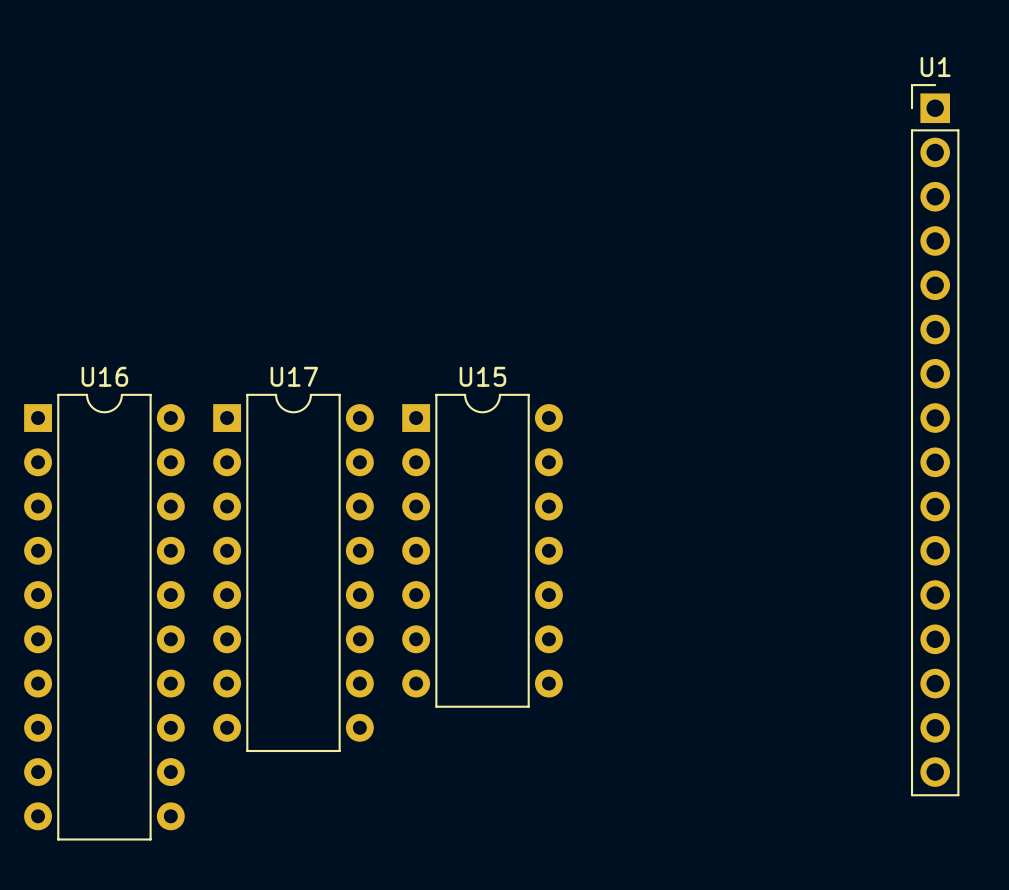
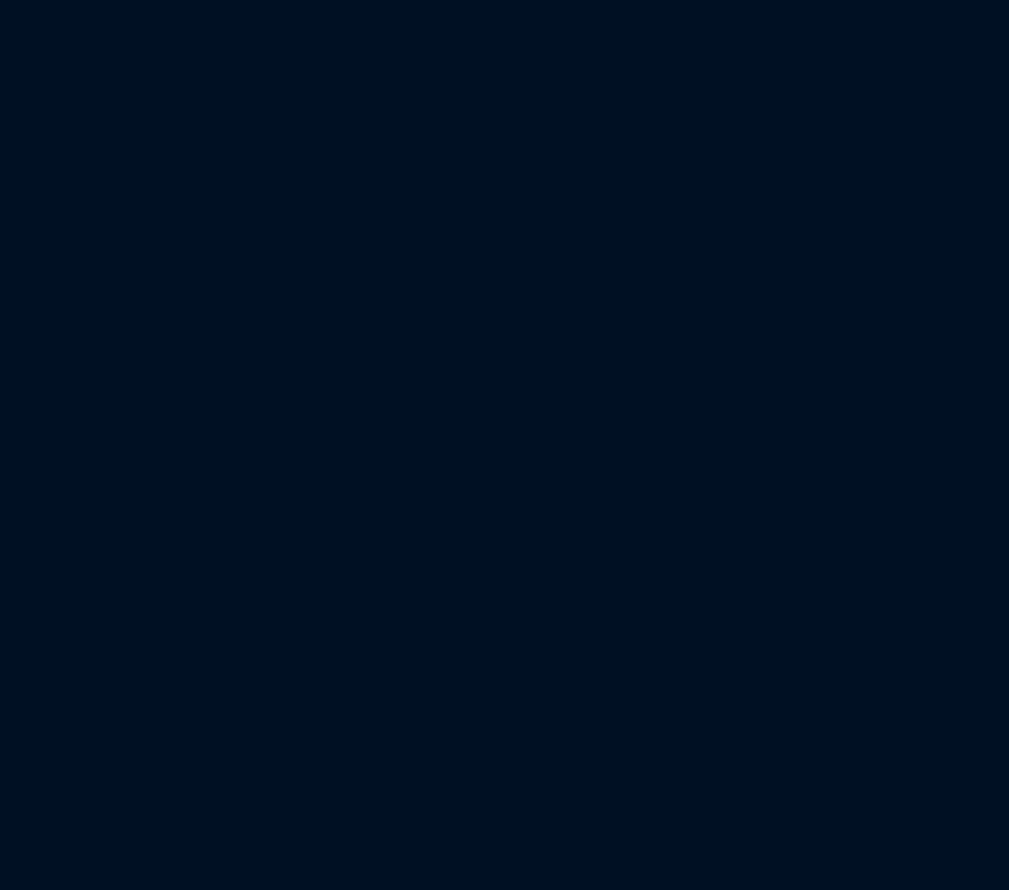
U1: (935, 440) -> none
U15: (482, 550) -> none
U17: (293, 572) -> none
U16: (104, 617) -> none

